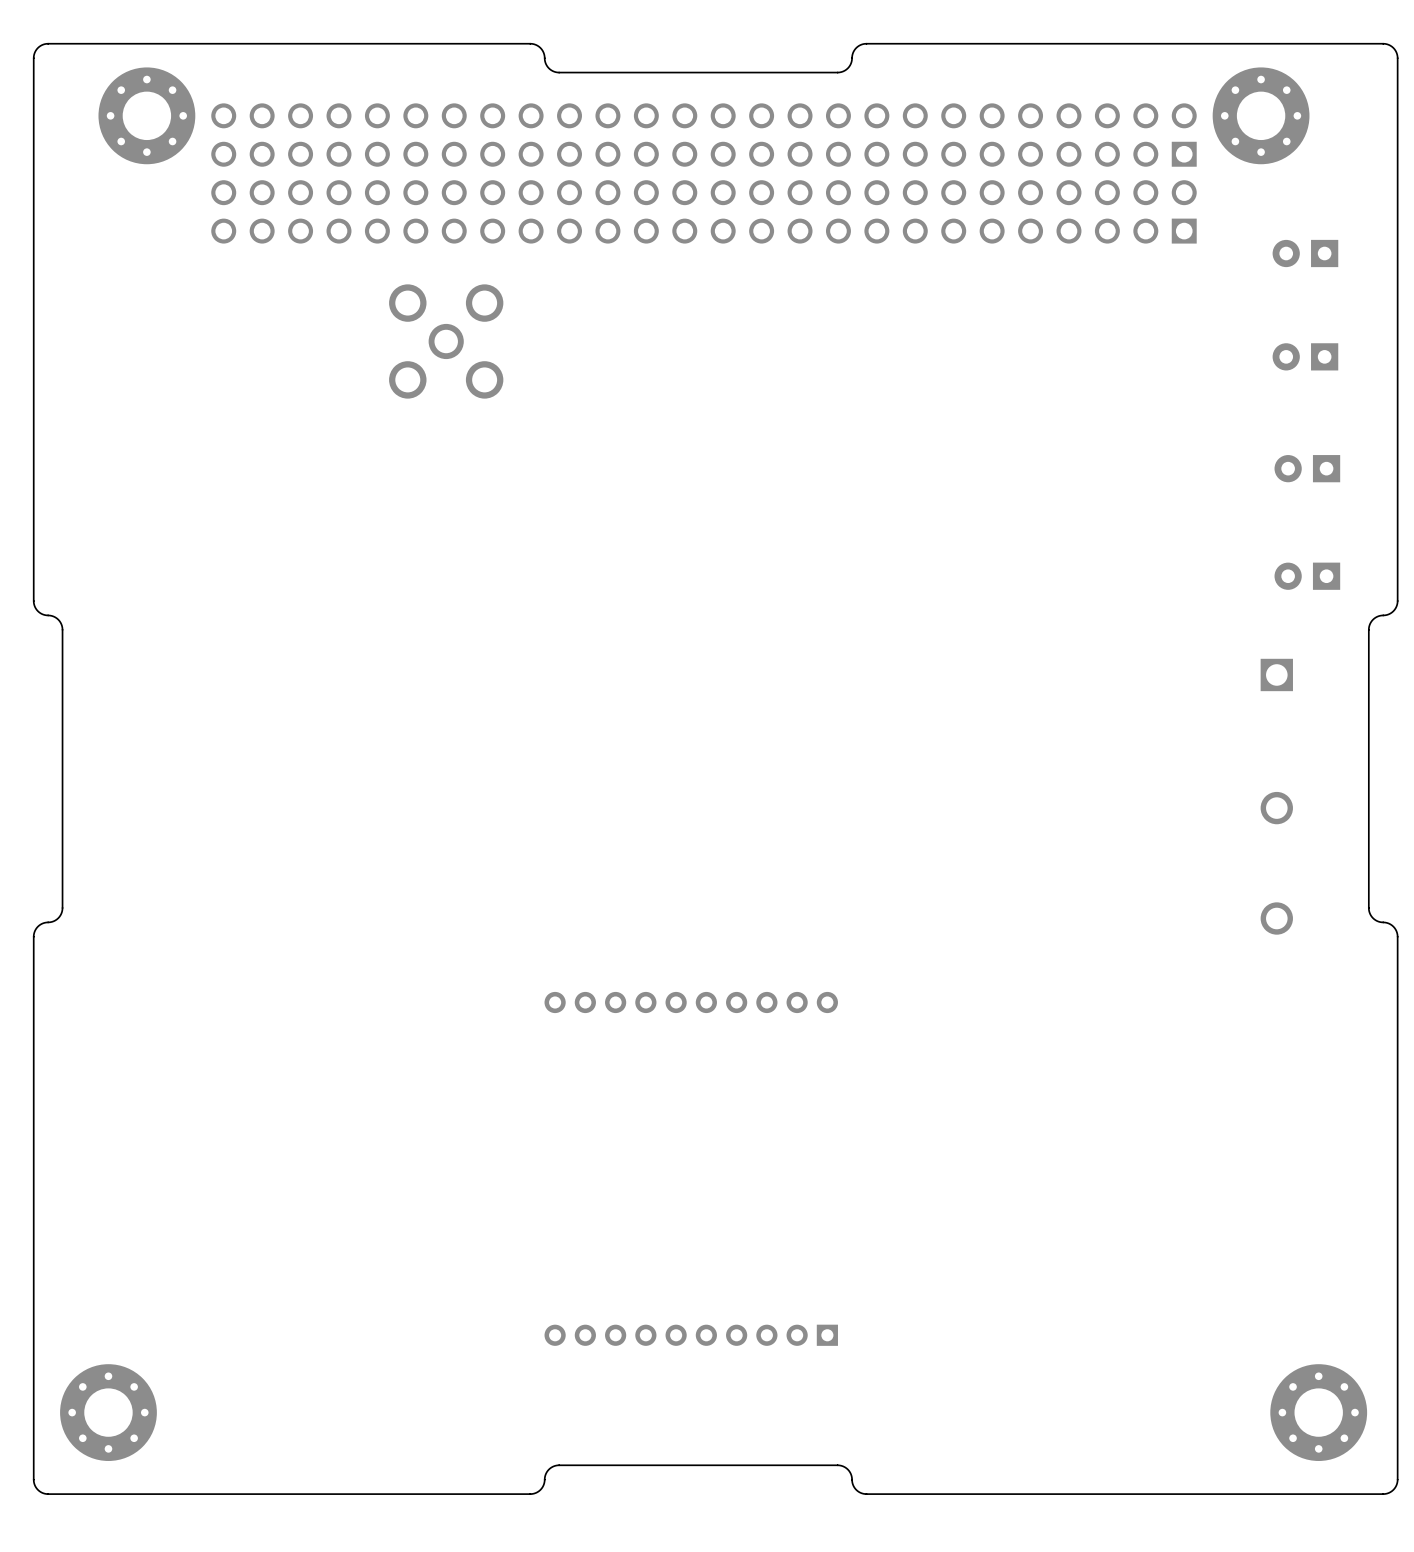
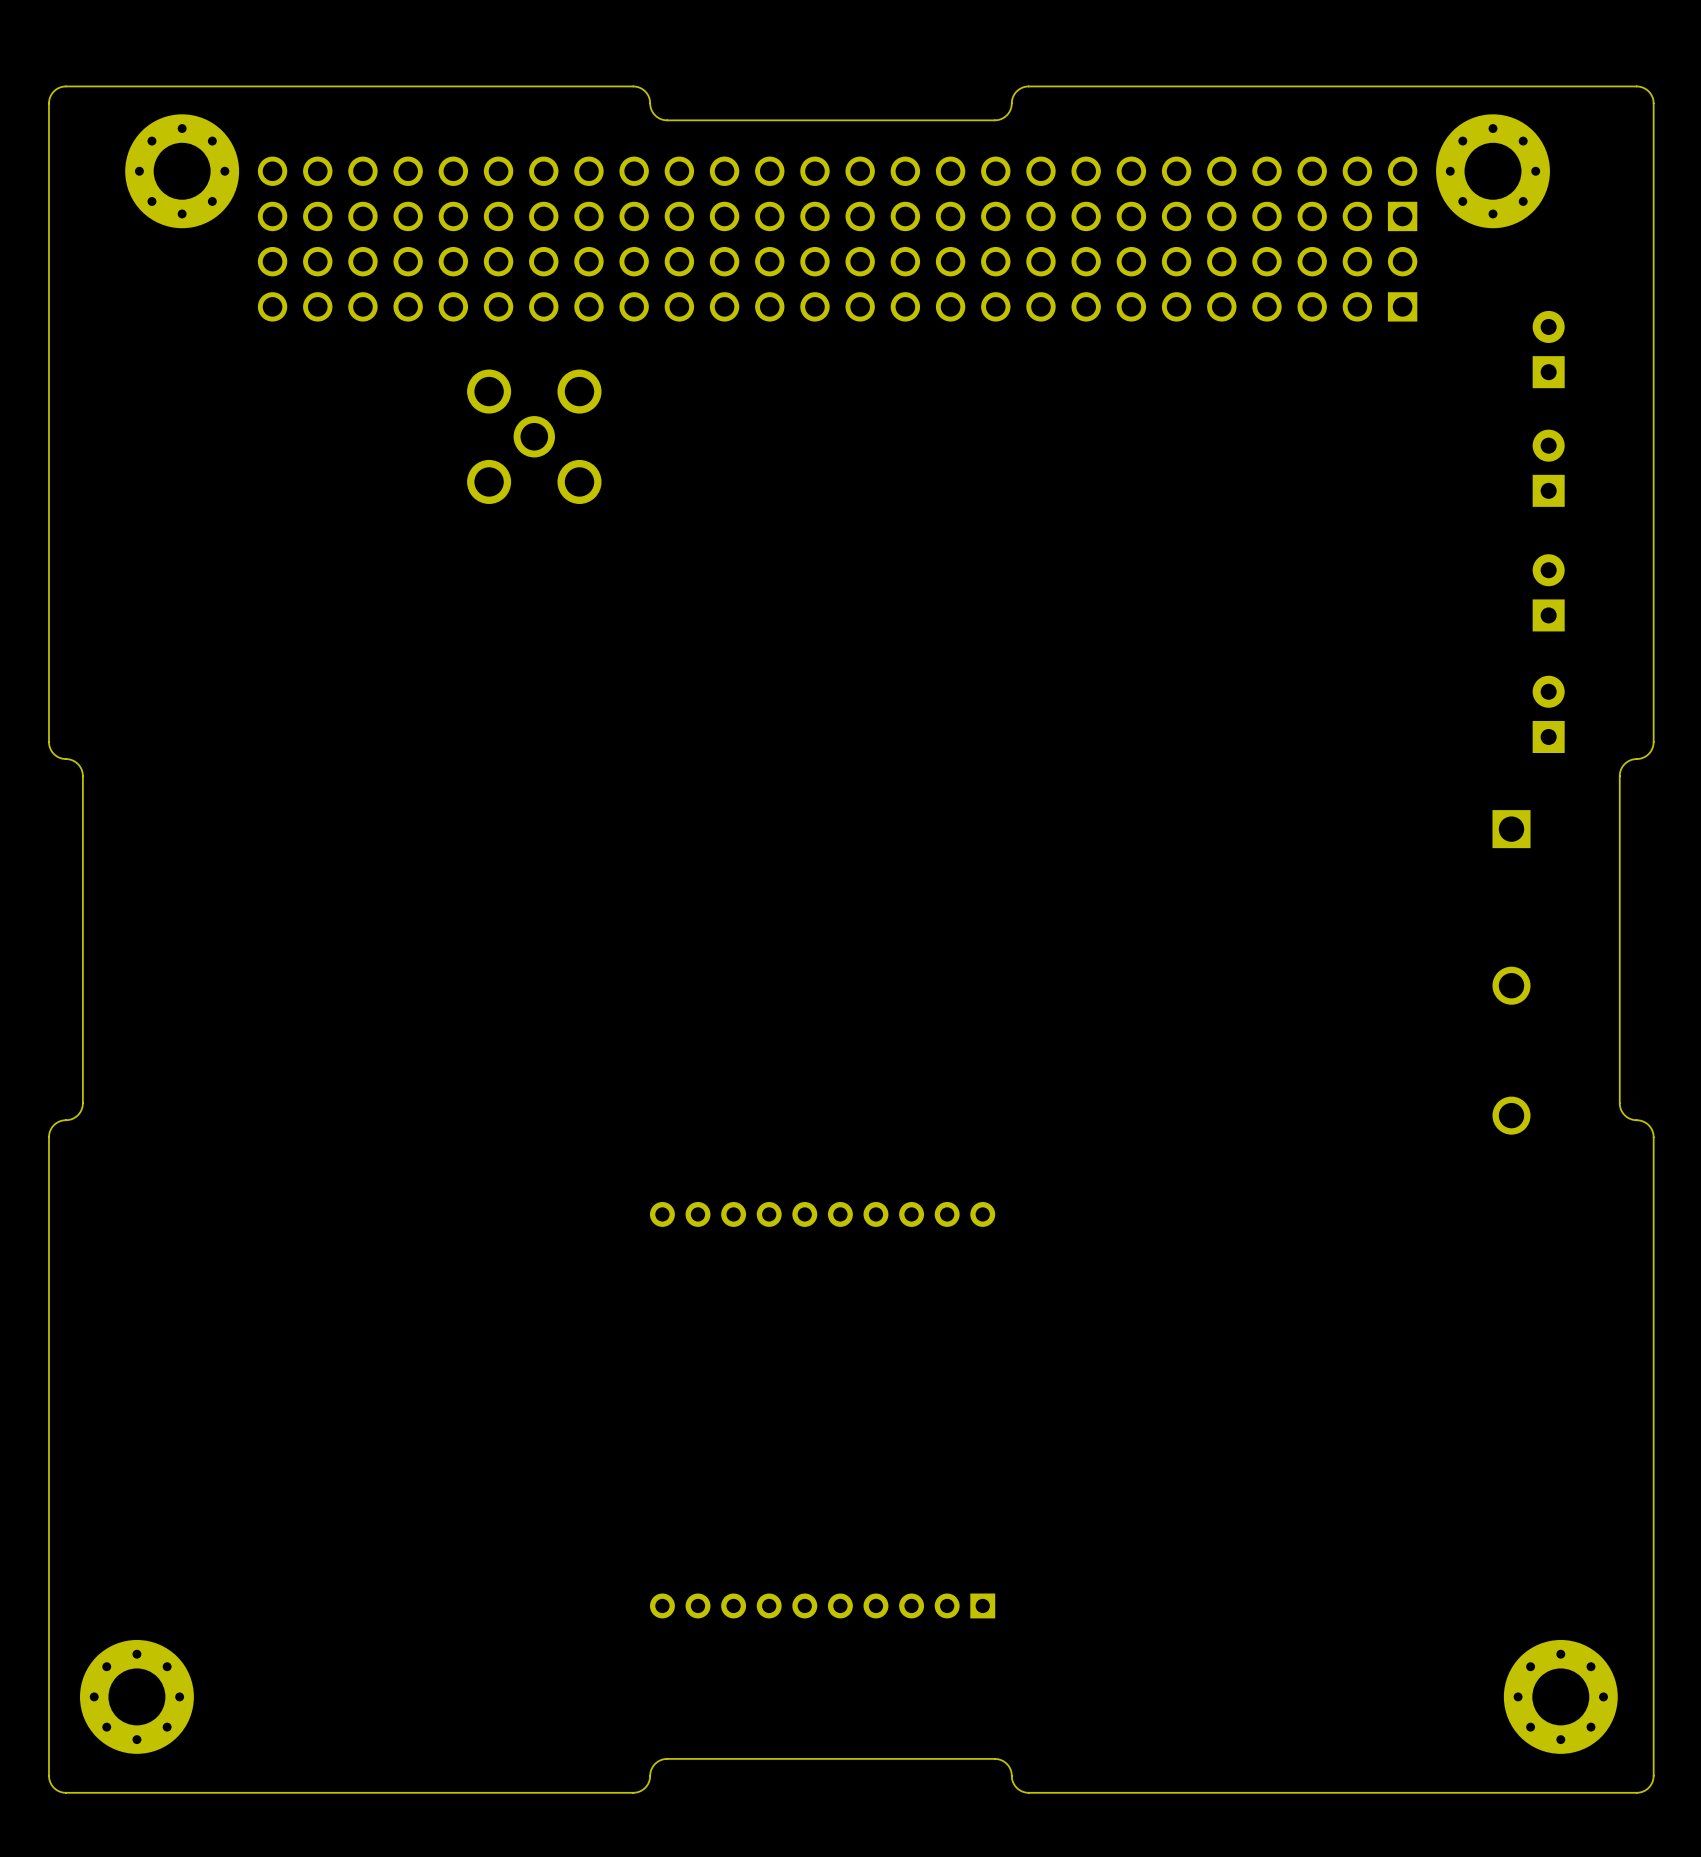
part rotation: 0° (1305, 253) -> 90° clockwise (1548, 349)
part rotation: 0° (1305, 356) -> 90° clockwise (1548, 468)
part rotation: 0° (1307, 468) -> 90° clockwise (1548, 592)
part rotation: 0° (1307, 576) -> 90° clockwise (1548, 714)

